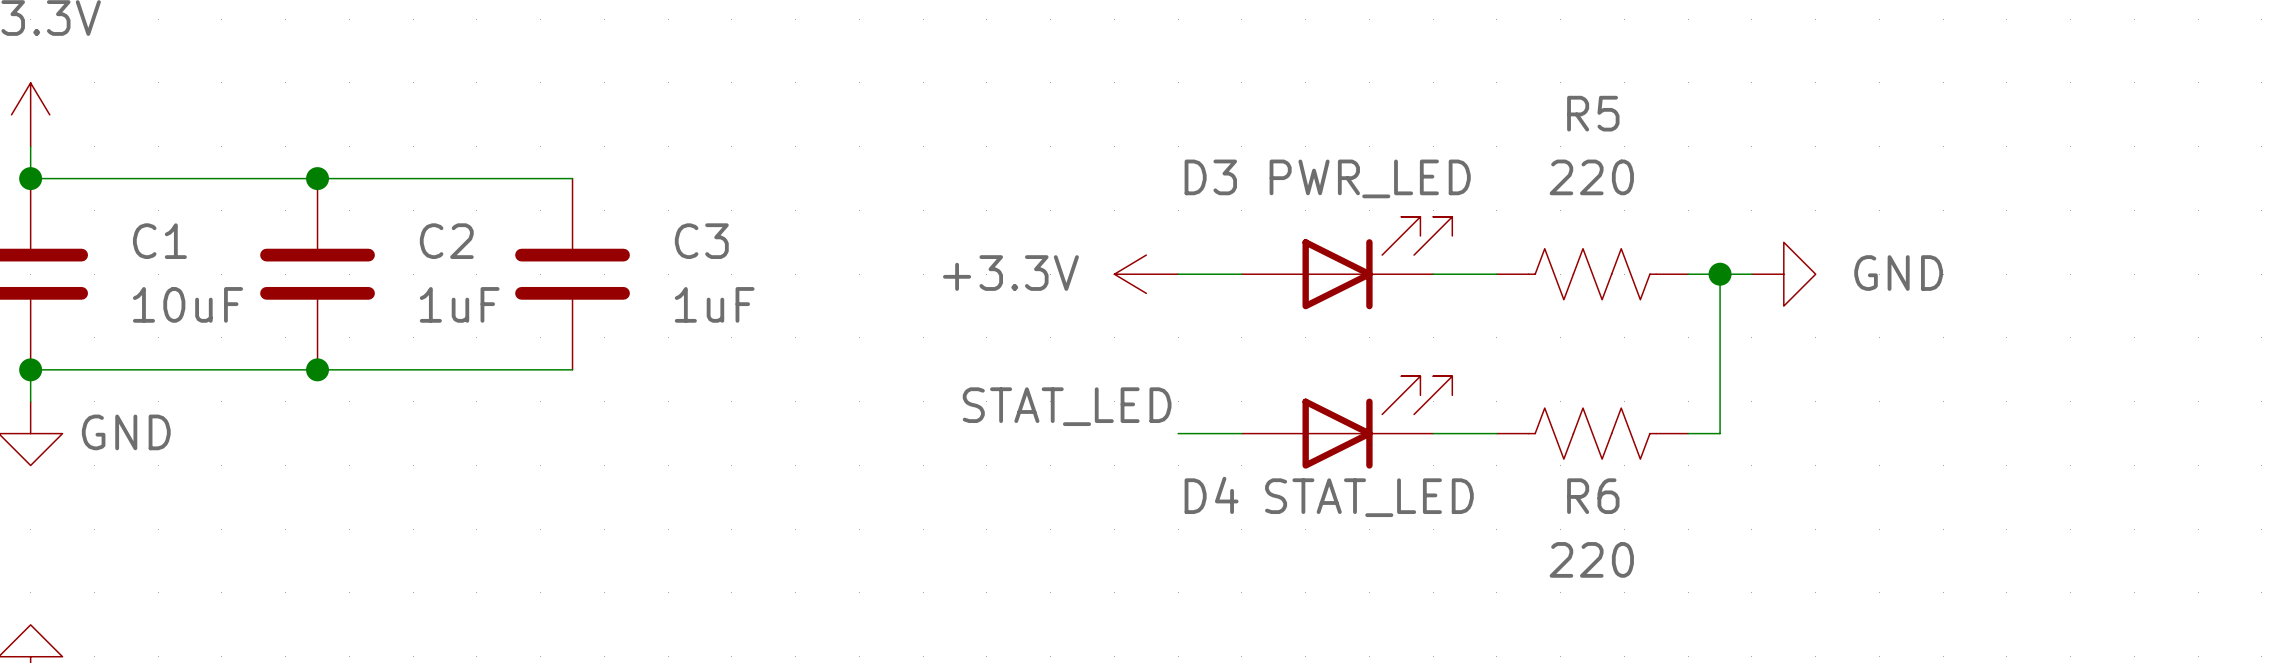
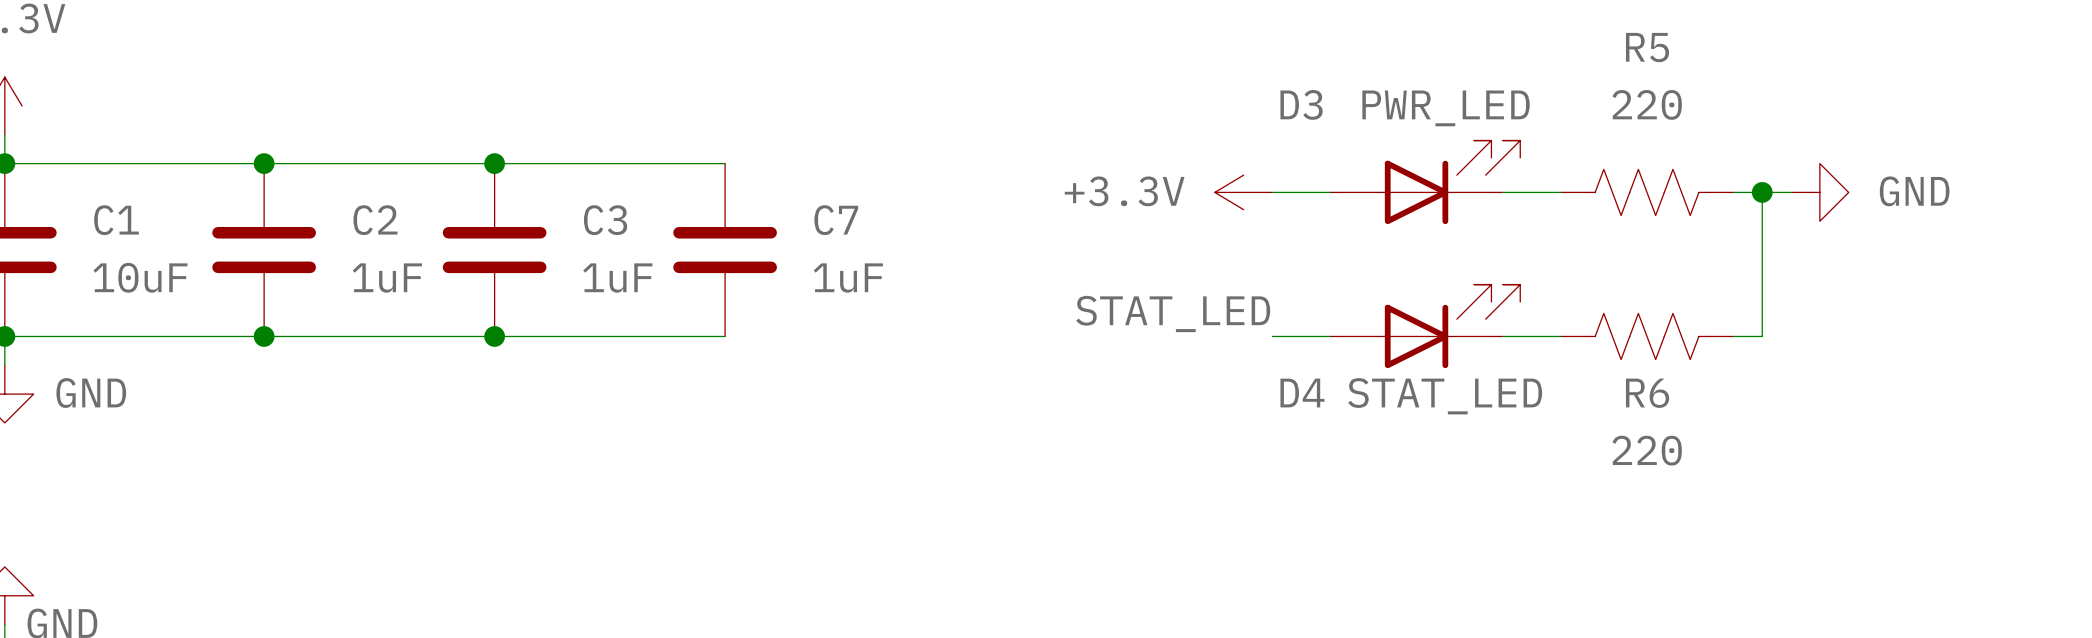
wire: none -> (494, 163) (725, 163)
junction: none -> (494, 163)
junction: none -> (1762, 192)
D3 position: (1347, 263) -> (1425, 182)
C7: none -> 1uF (725, 250)
power symbol position: +3.3V (1146, 274) -> +3.3V (1243, 192)
wire: (1178, 274) (1241, 274) -> (1272, 192) (1330, 192)
wire: (1433, 274) (1496, 274) -> (1502, 192) (1560, 192)
R5 position: (1592, 274) -> (1647, 192)
wire: (1688, 274) (1751, 274) -> (1733, 192) (1791, 192)
wire: (1720, 274) (1720, 433) (1688, 433) -> (1762, 192) (1762, 336) (1733, 336)
junction: (1720, 274) -> none
power symbol position: GND (1783, 274) -> GND (1819, 192)
wire: none -> (494, 336) (725, 336)
junction: none -> (494, 336)
label position: STAT_LED (1067, 406) -> STAT_LED (1173, 314)
D4 position: (1347, 422) -> (1425, 326)
wire: (1178, 433) (1241, 433) -> (1272, 336) (1330, 336)
wire: (1433, 433) (1496, 433) -> (1502, 336) (1560, 336)
R6 position: (1592, 433) -> (1647, 336)

